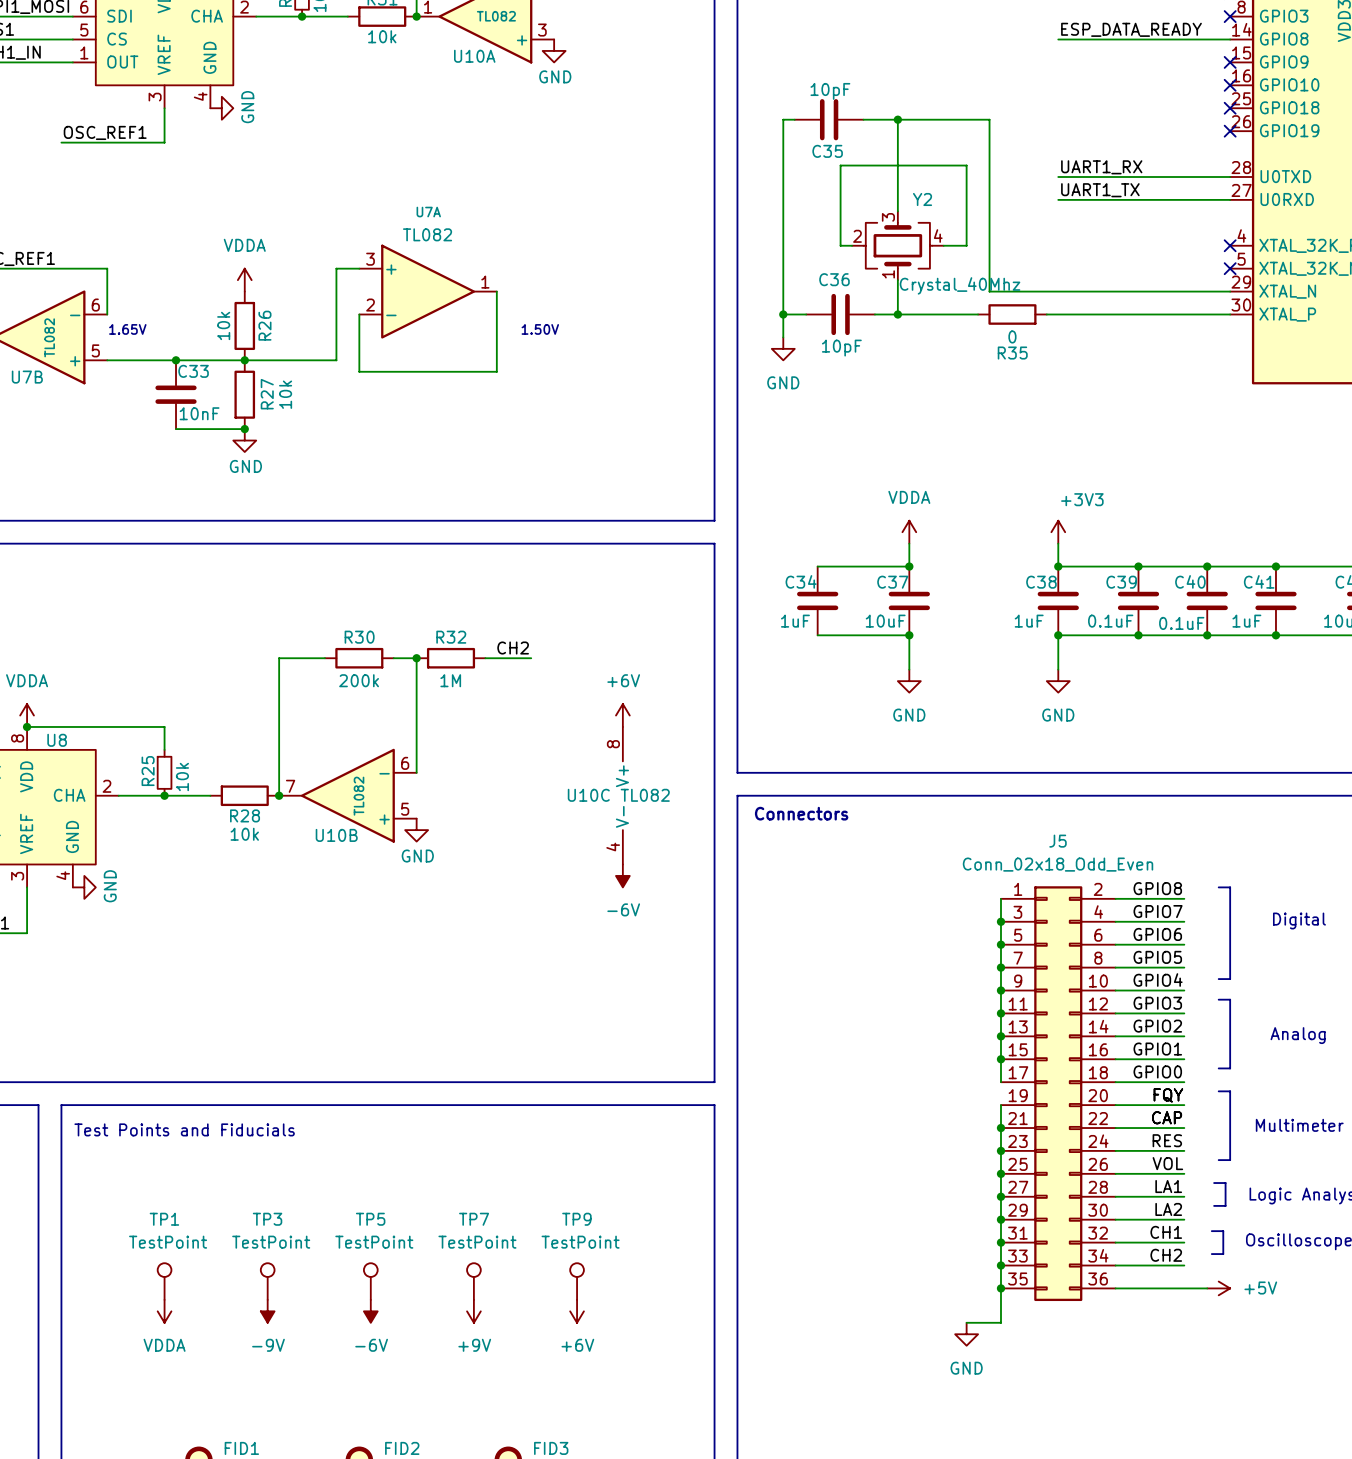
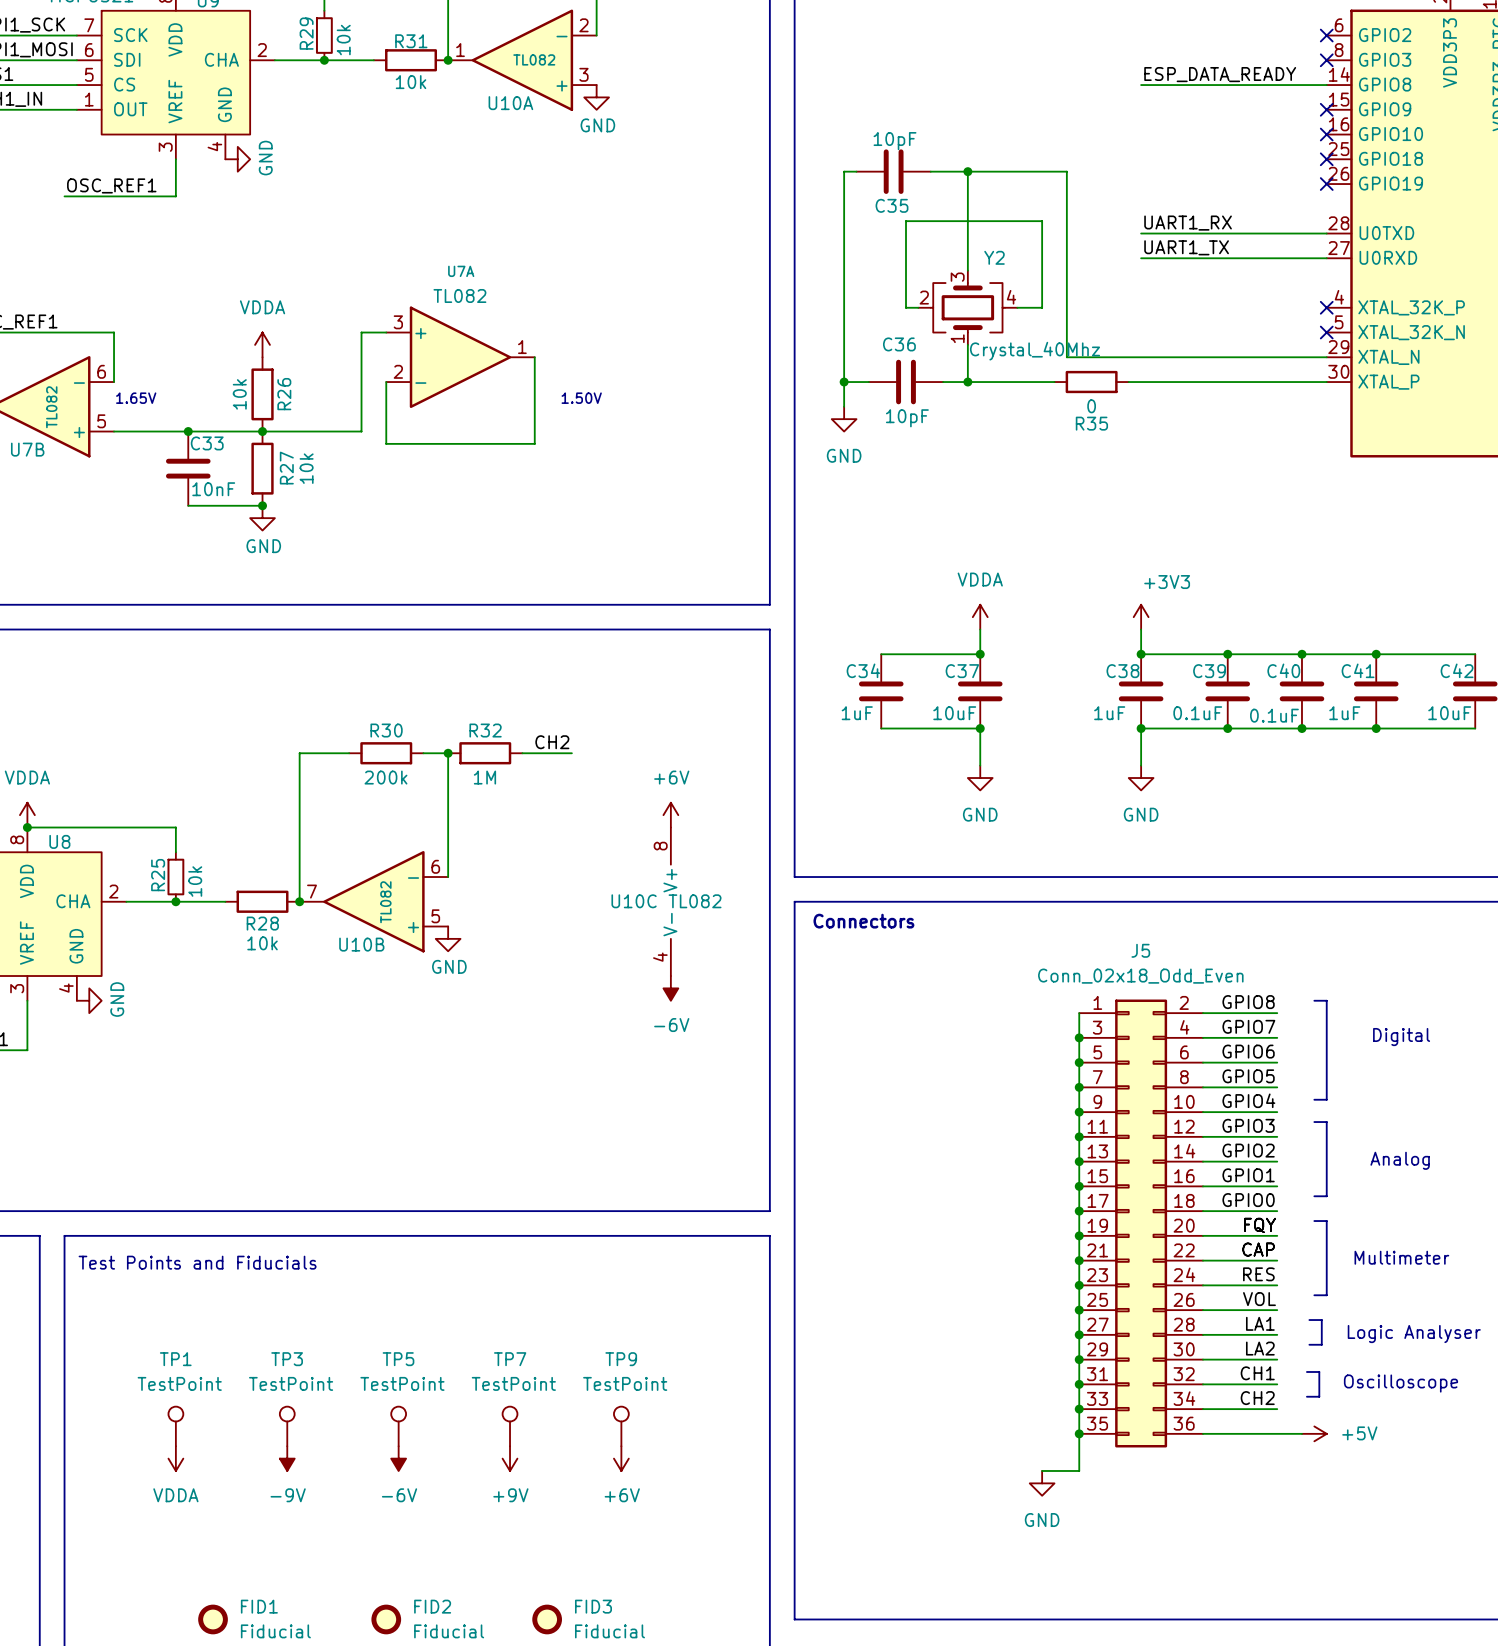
wire: none -> (1079, 1211) (1079, 1235)
junction: none -> (1079, 1211)
junction: none -> (1079, 1235)

